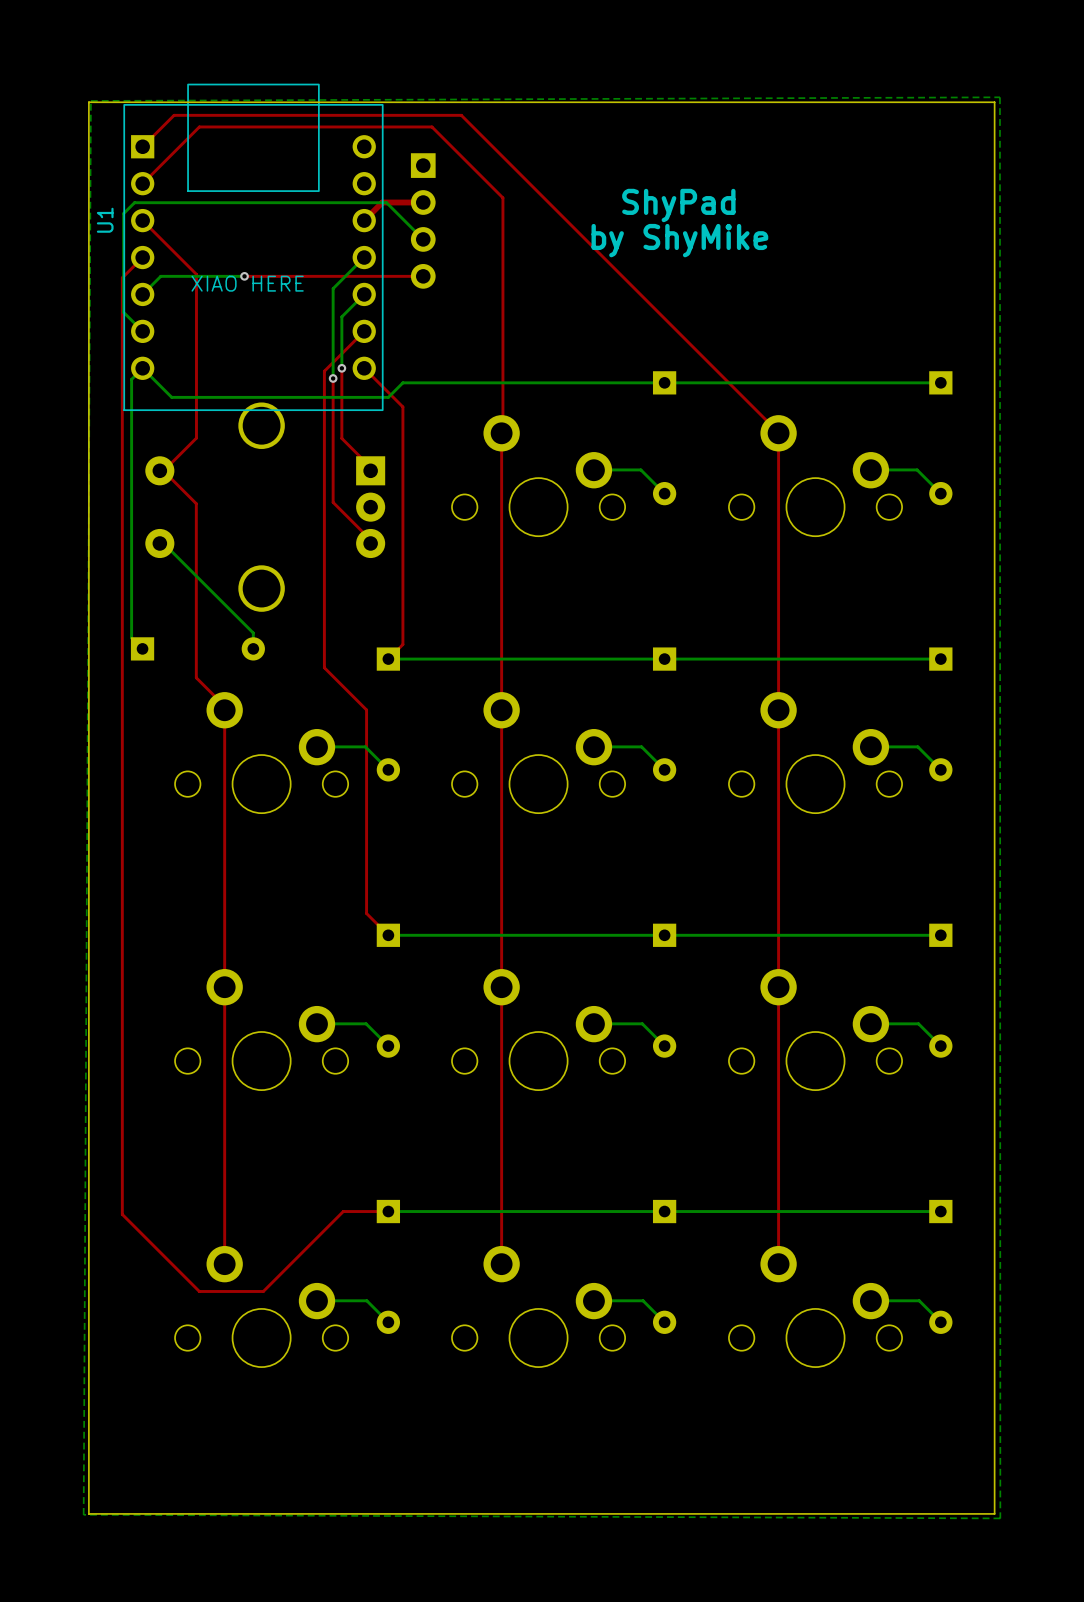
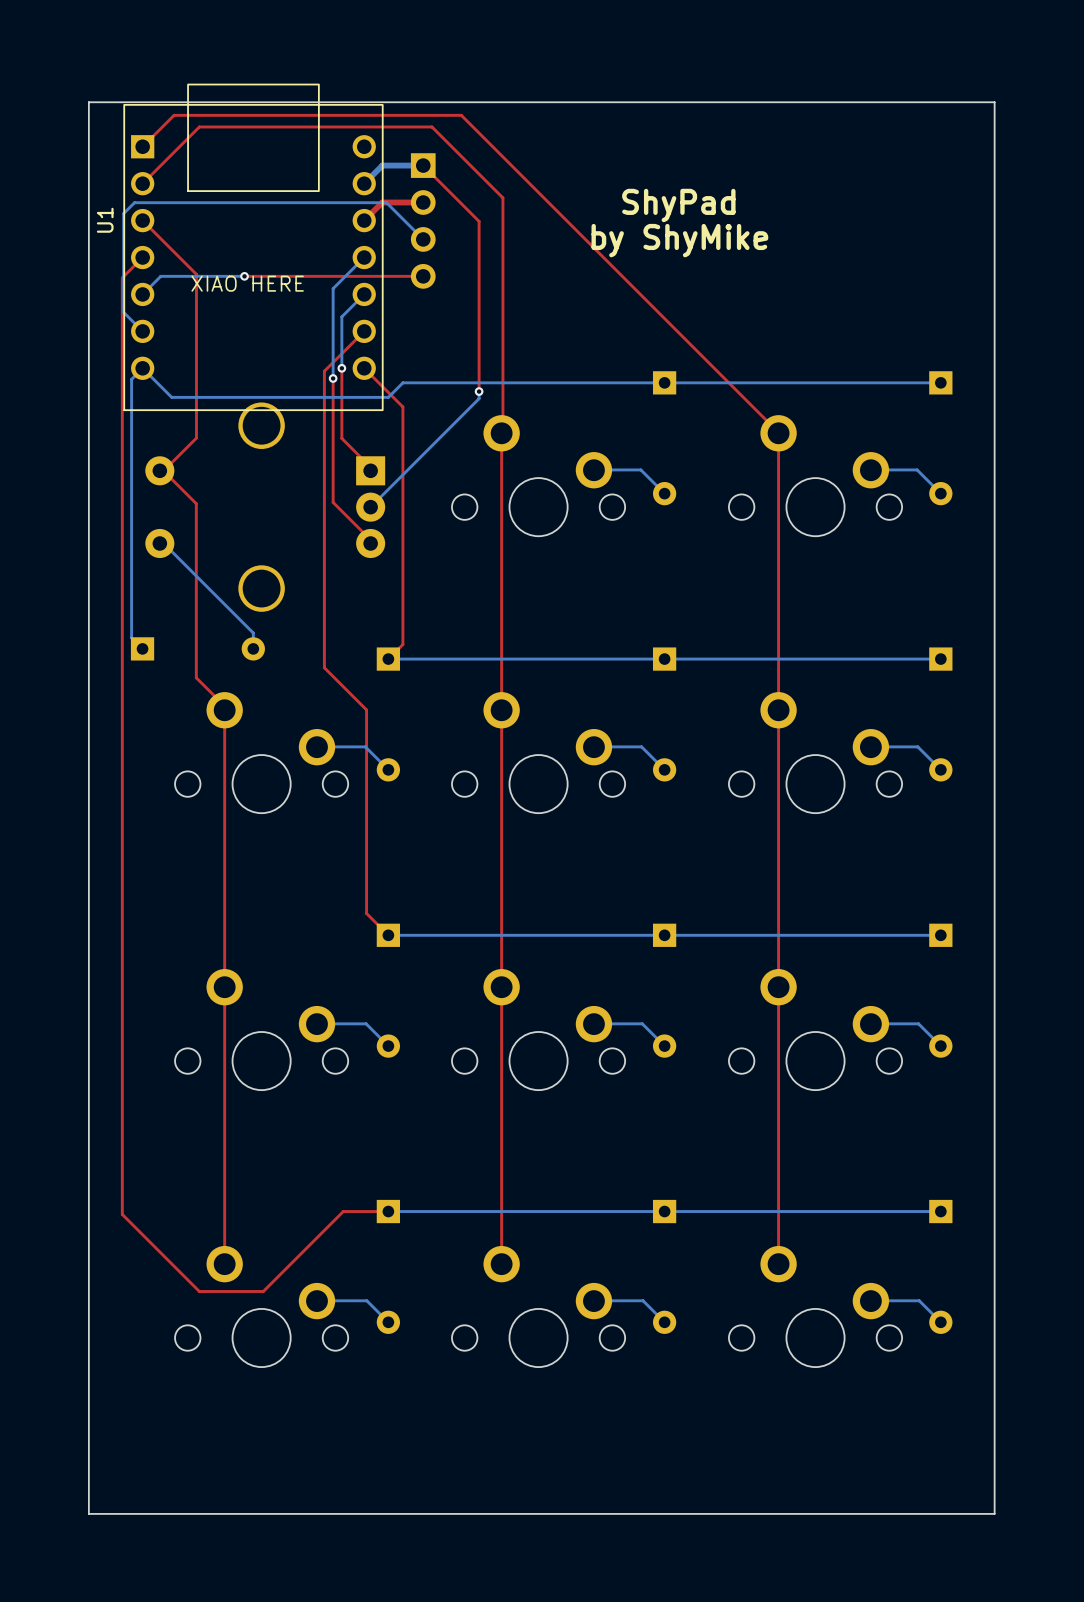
bottom zone outline: (999, 97) (1000, 1518) (83, 1514) (90, 100) (999, 97) -> none
bottom track: none -> (423, 165) (382, 165) (364, 183)
top track: none -> (423, 165) (479, 221) (479, 390)
bottom track: none -> (479, 391) (479, 398) (370, 507)
via: none -> (479, 391)

